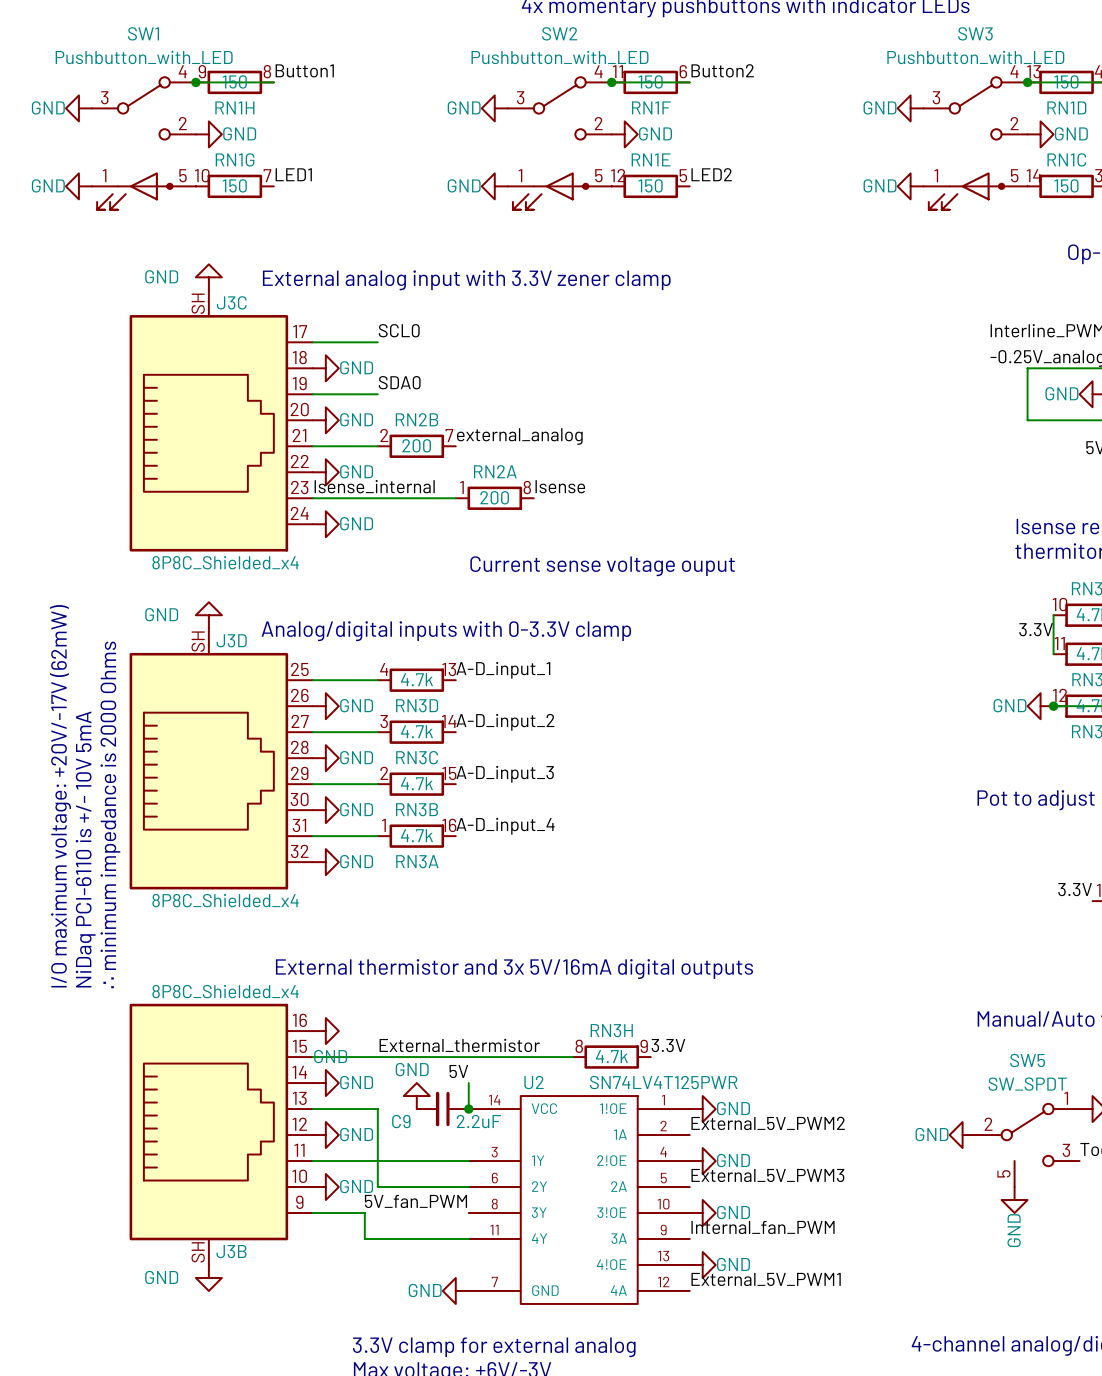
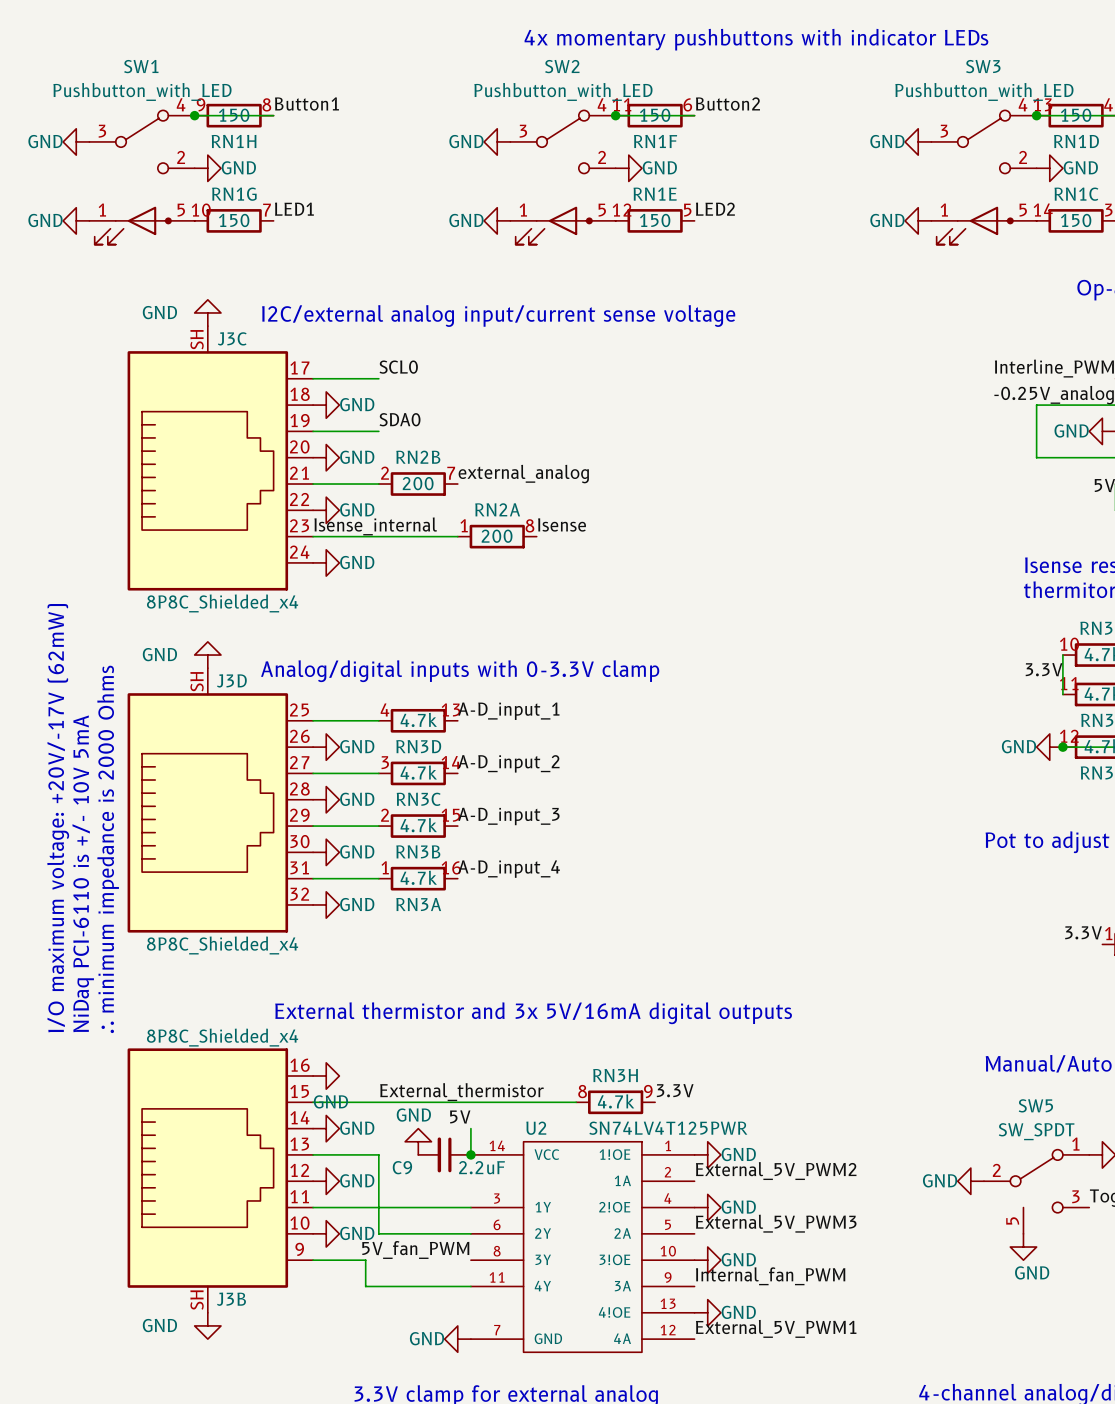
text: External analog input with 3.3V zener clamp (466, 280) -> I2C/external analog input/current sense voltage (498, 316)
text: Current sense voltage ouput (602, 566) -> none
power symbol text rotation: 0° (1014, 1230) -> 90° clockwise (1032, 1272)

